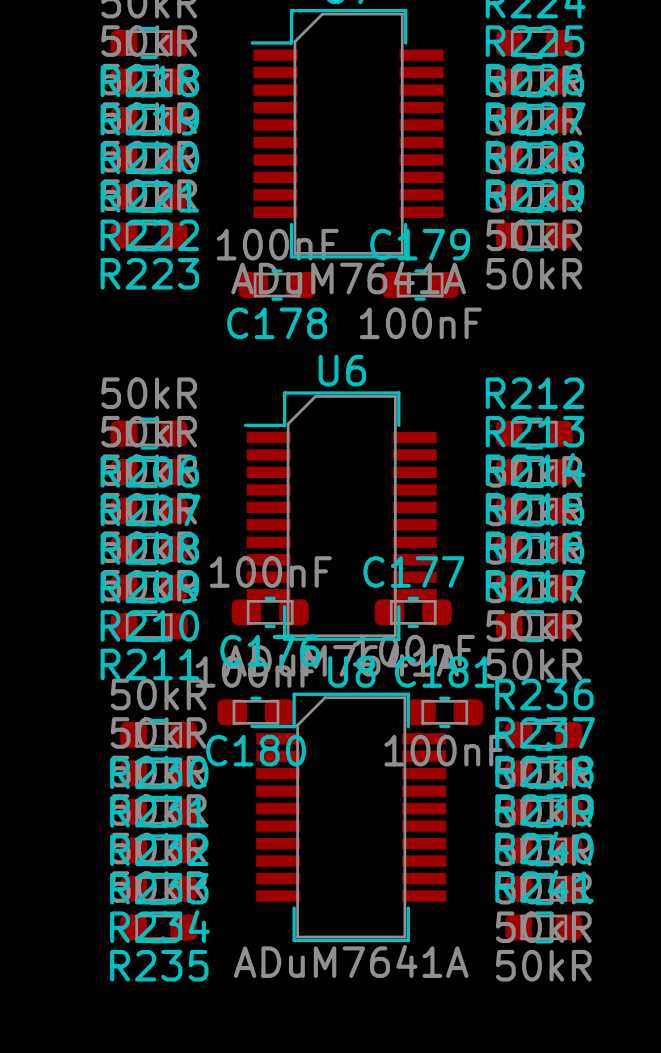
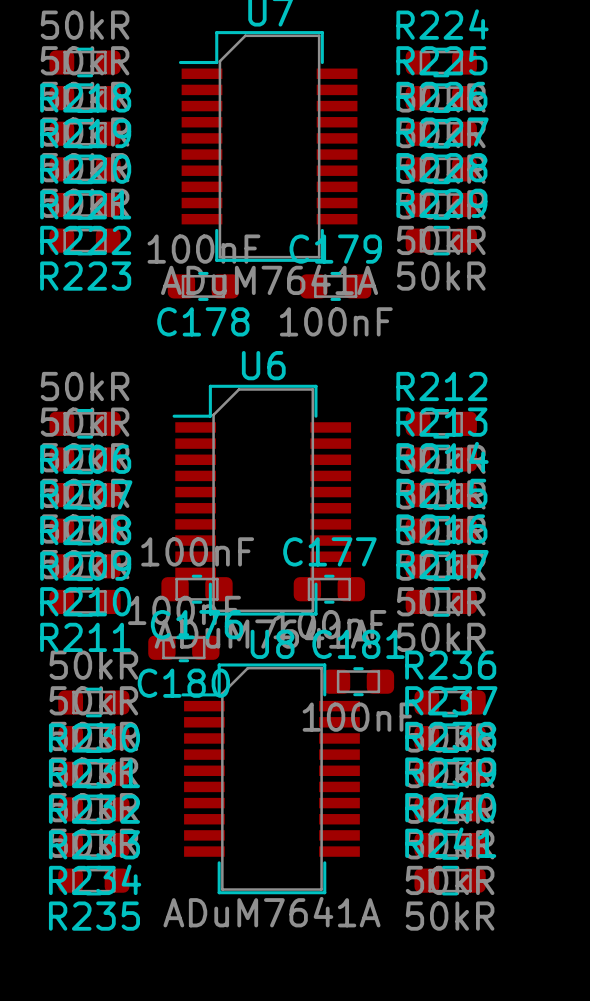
C180 position: (255, 712) -> (183, 647)

